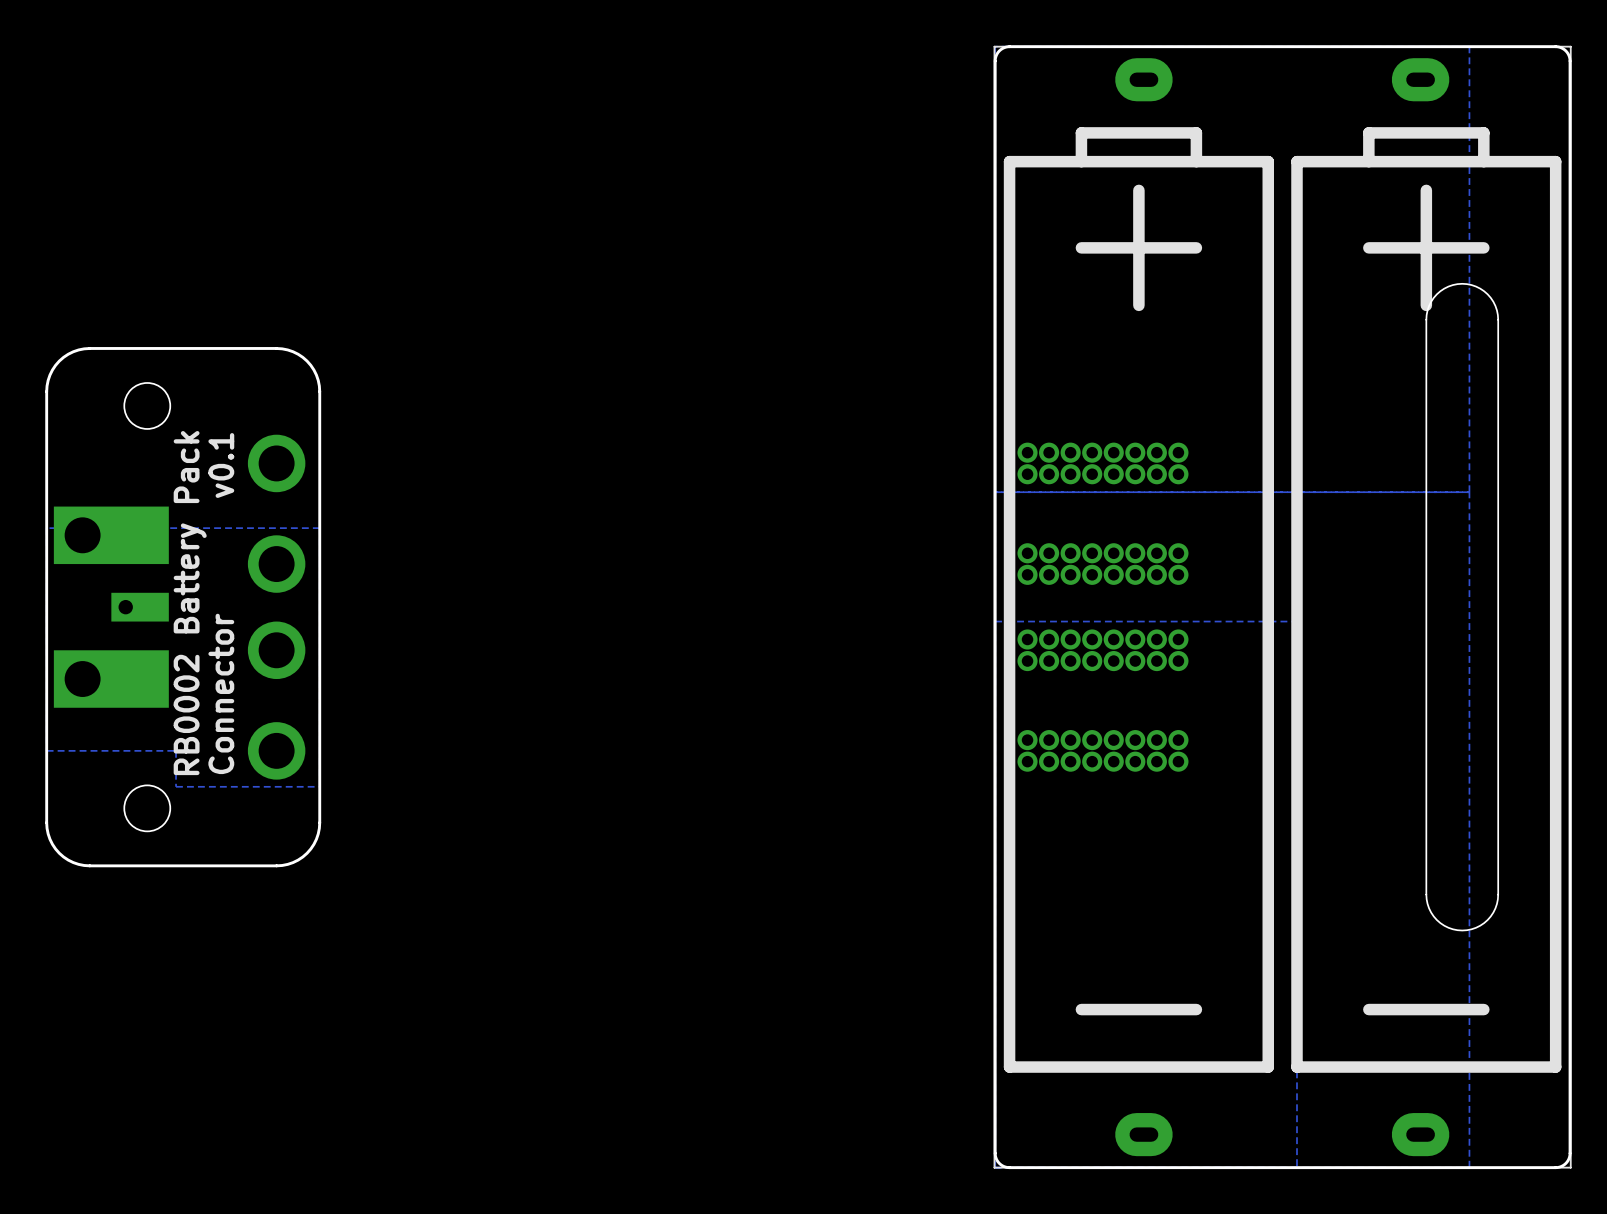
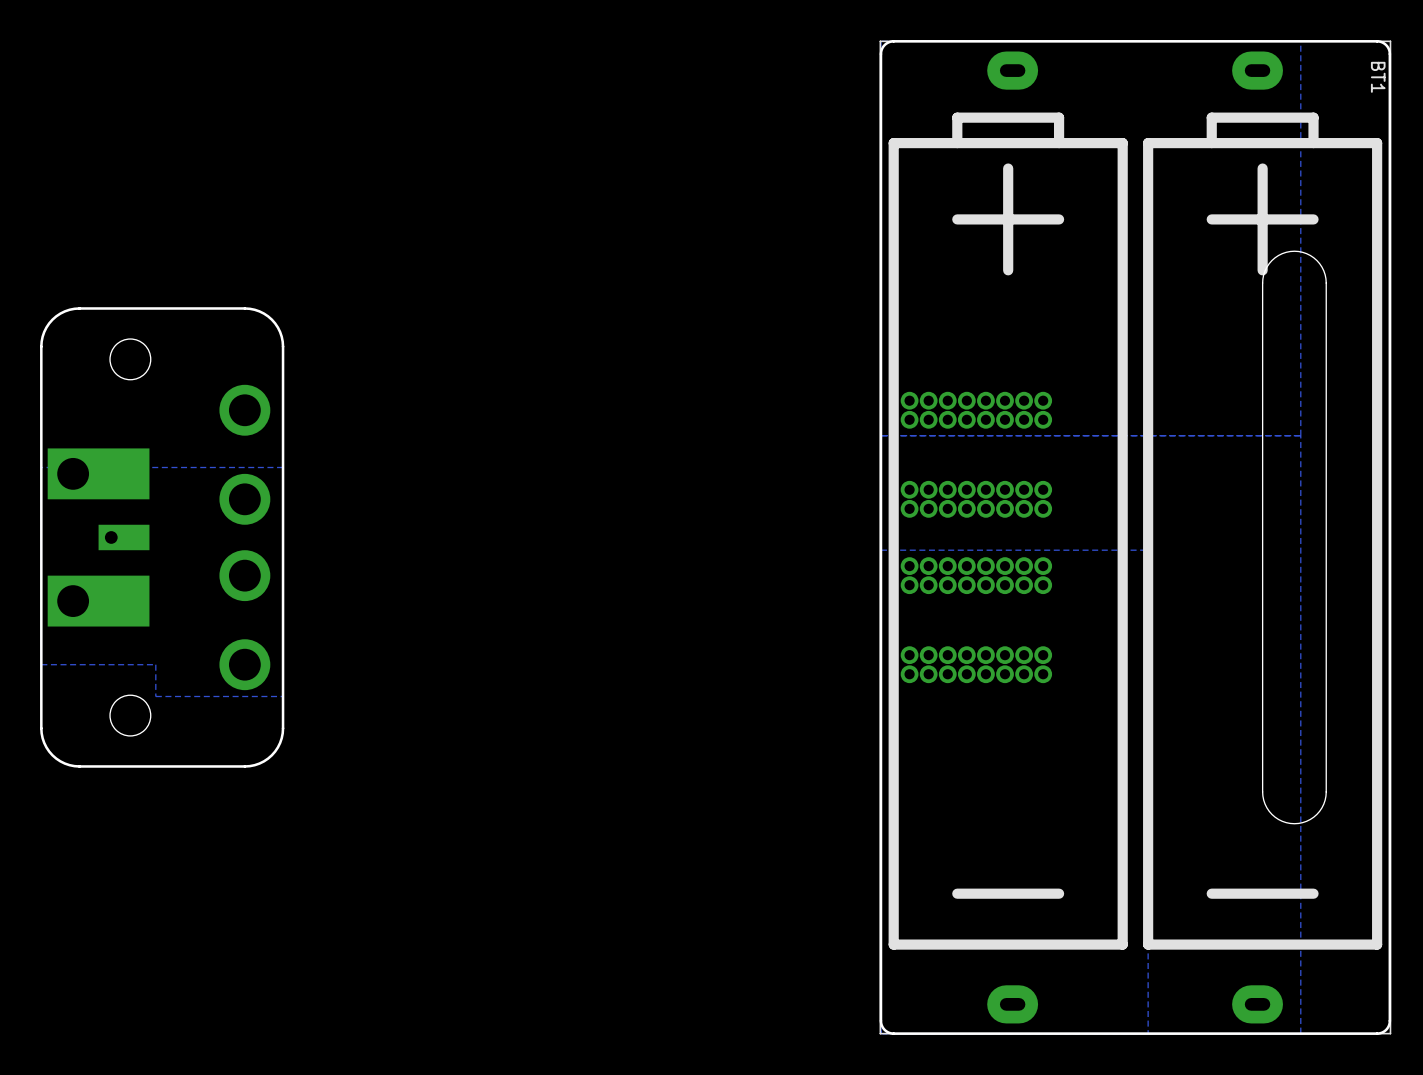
BT1 name: none -> BT1 (1378, 77)
text: RB0002 Battery Pack (190, 603) -> none
text: Connector v0.1 (221, 603) -> none

